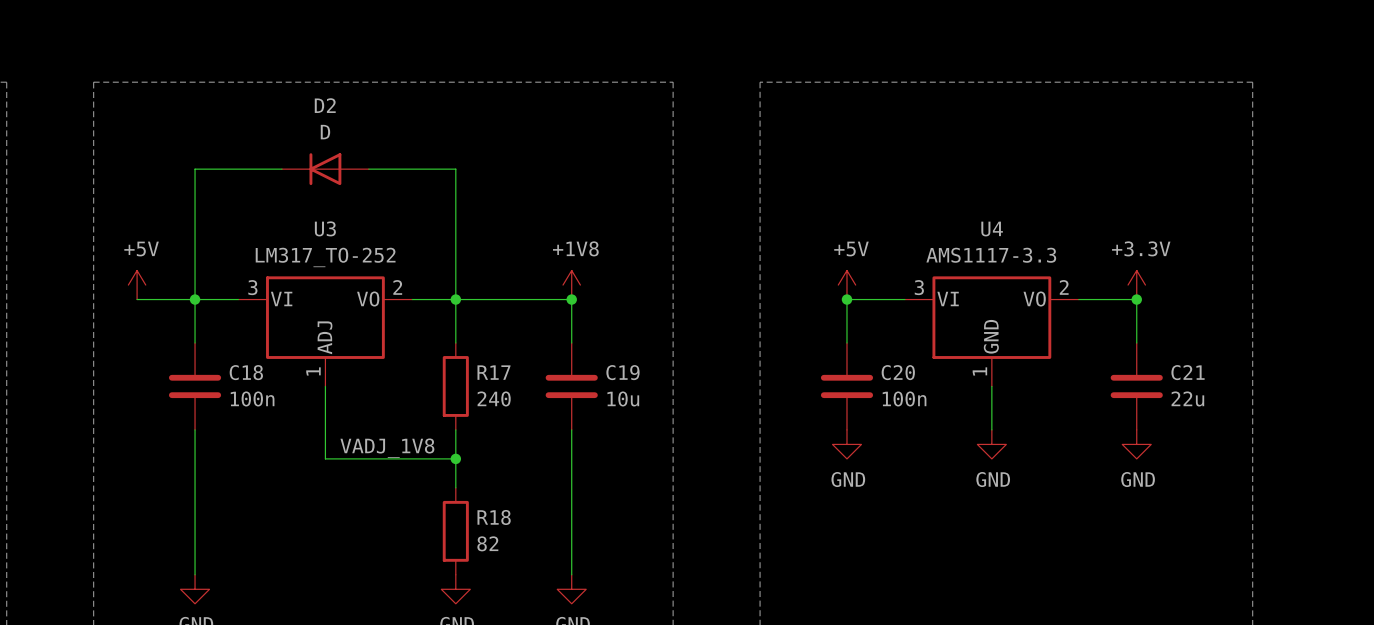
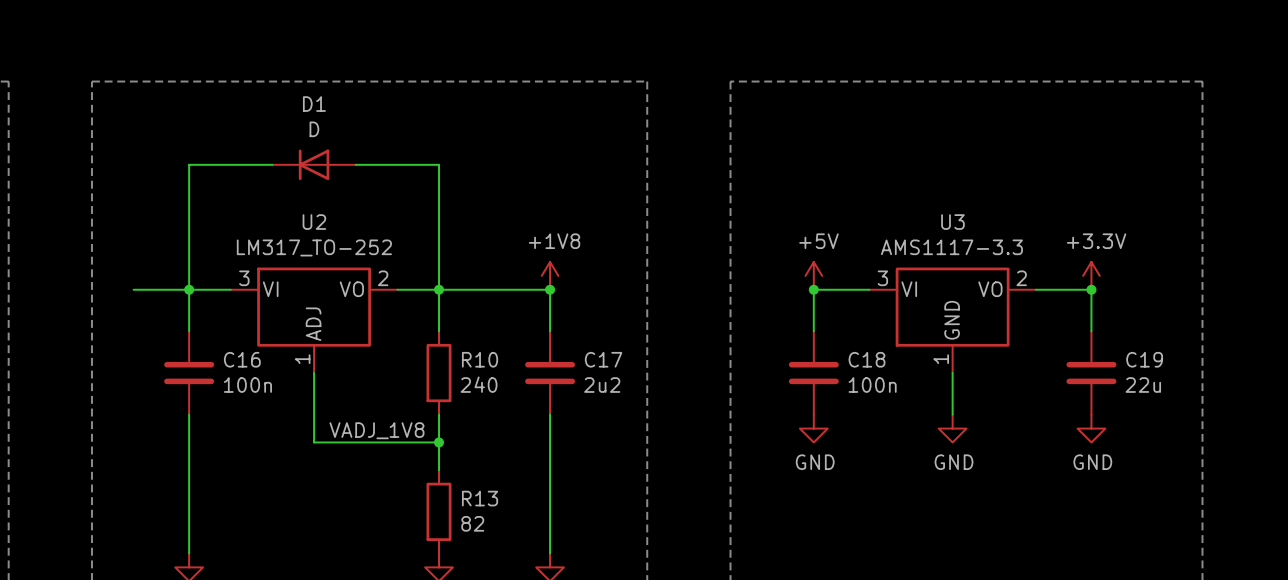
D2 name: D2 (325, 105) -> D1 (314, 104)
U3 name: U3 (325, 228) -> U2 (314, 222)
U4 name: U4 (992, 229) -> U3 (952, 222)
power symbol: +5V (137, 285) -> none
C18 name: C18 (246, 372) -> C16 (242, 359)
R17 name: R17 (493, 372) -> R10 (480, 359)
C19 name: C19 (622, 372) -> C17 (603, 359)
C20 name: C20 (898, 372) -> C18 (866, 359)
C21 name: C21 (1188, 372) -> C19 (1144, 359)
C19 value: 10u (623, 398) -> 2u2 (602, 385)
R18 name: R18 (494, 517) -> R13 (480, 498)

